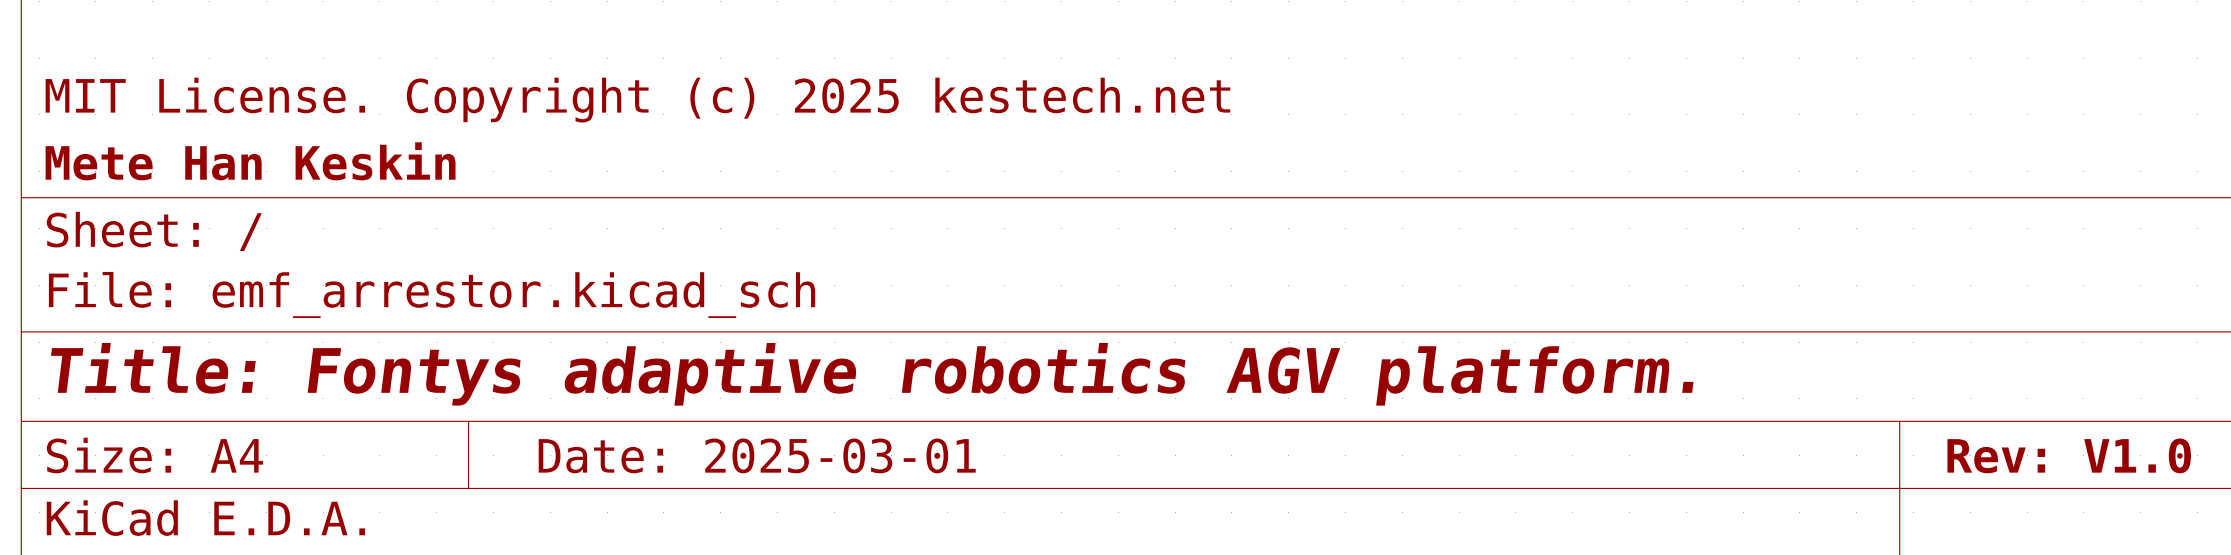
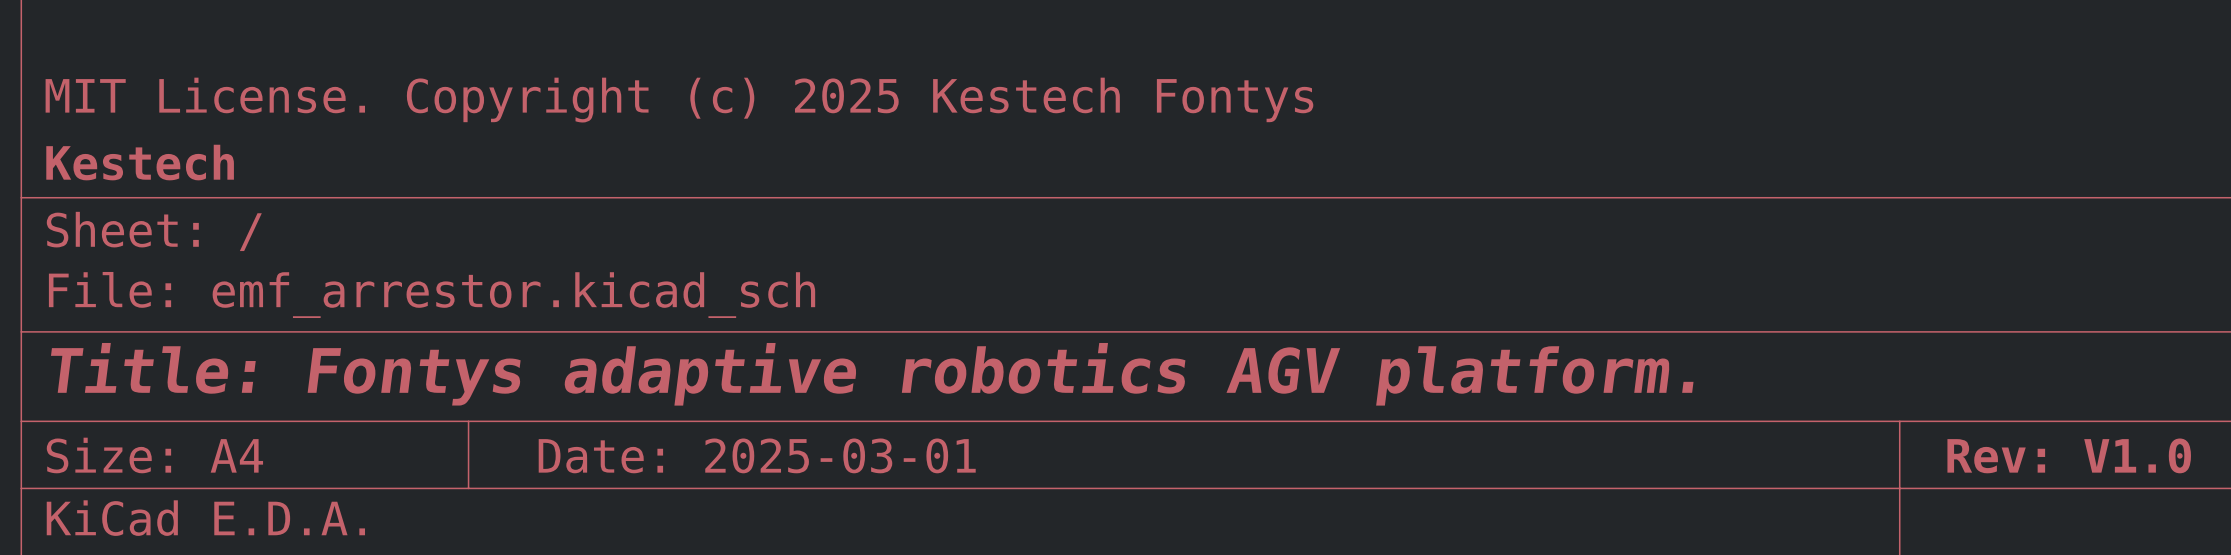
title block: MIT License. Copyright (c) 2025 kestech.net (637, 100) -> MIT License. Copyright (c) 2025 Kestech Fontys (679, 100)
title block: Mete Han Keskin (250, 161) -> Kestech (140, 162)

